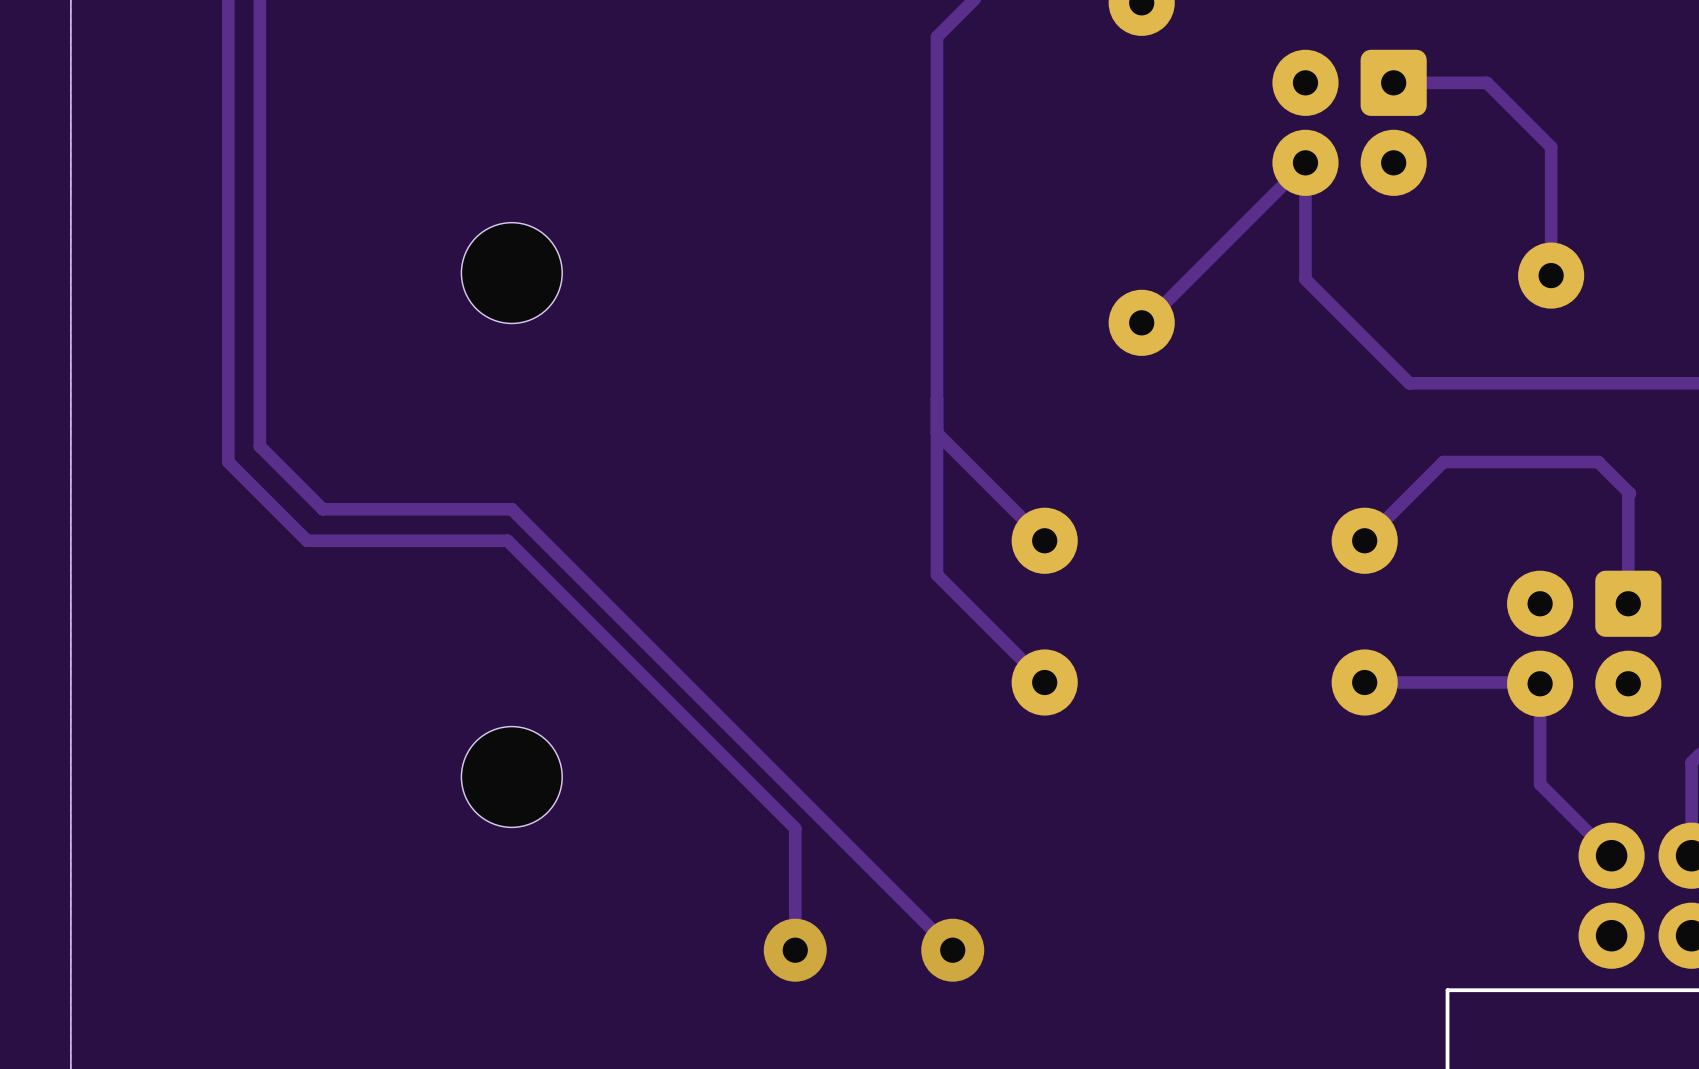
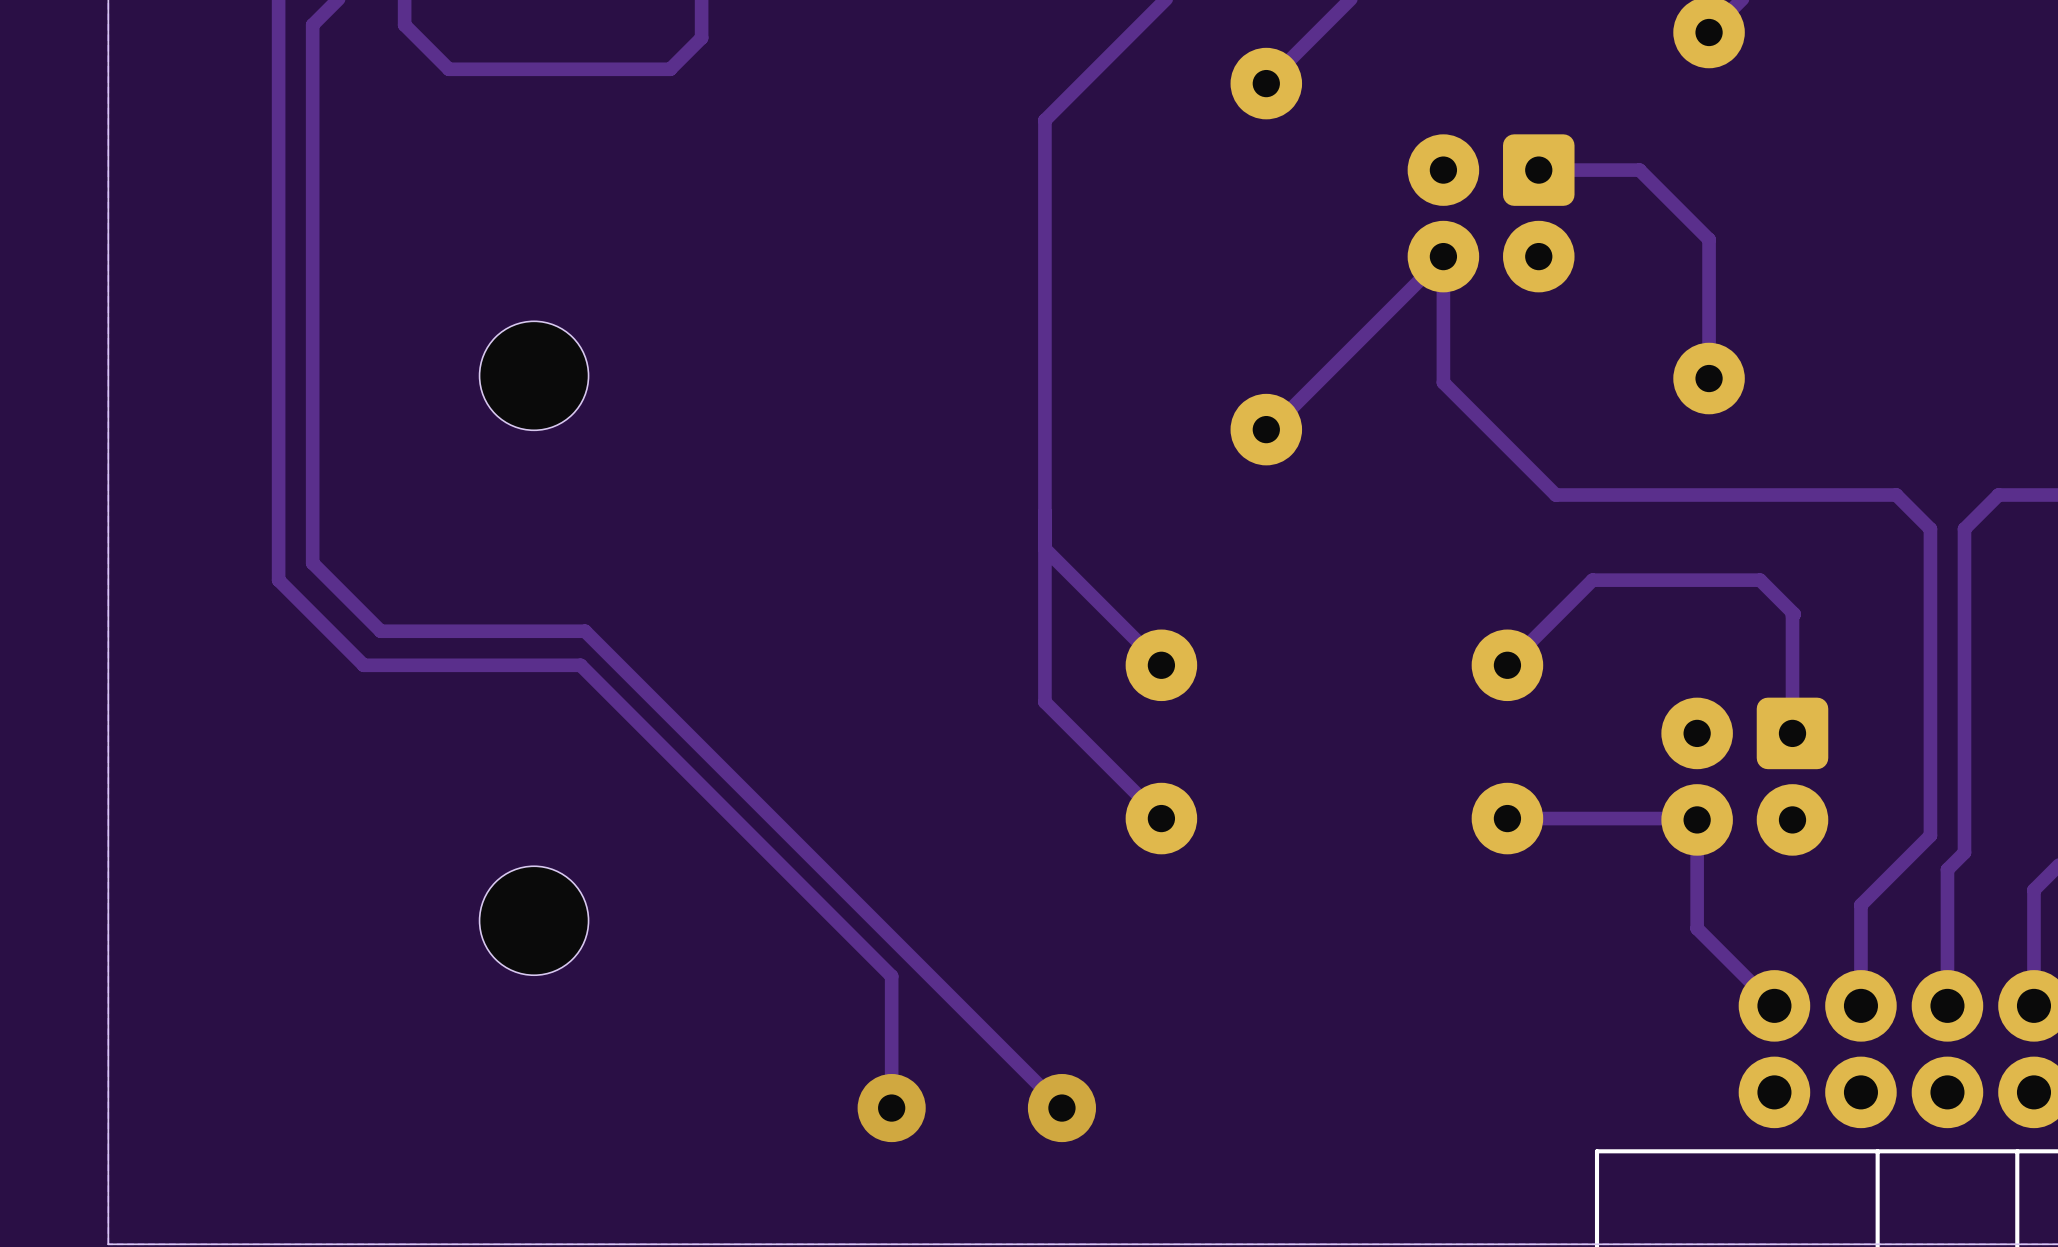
part position: (511, 273) -> (534, 375)
part position: (511, 776) -> (534, 920)

